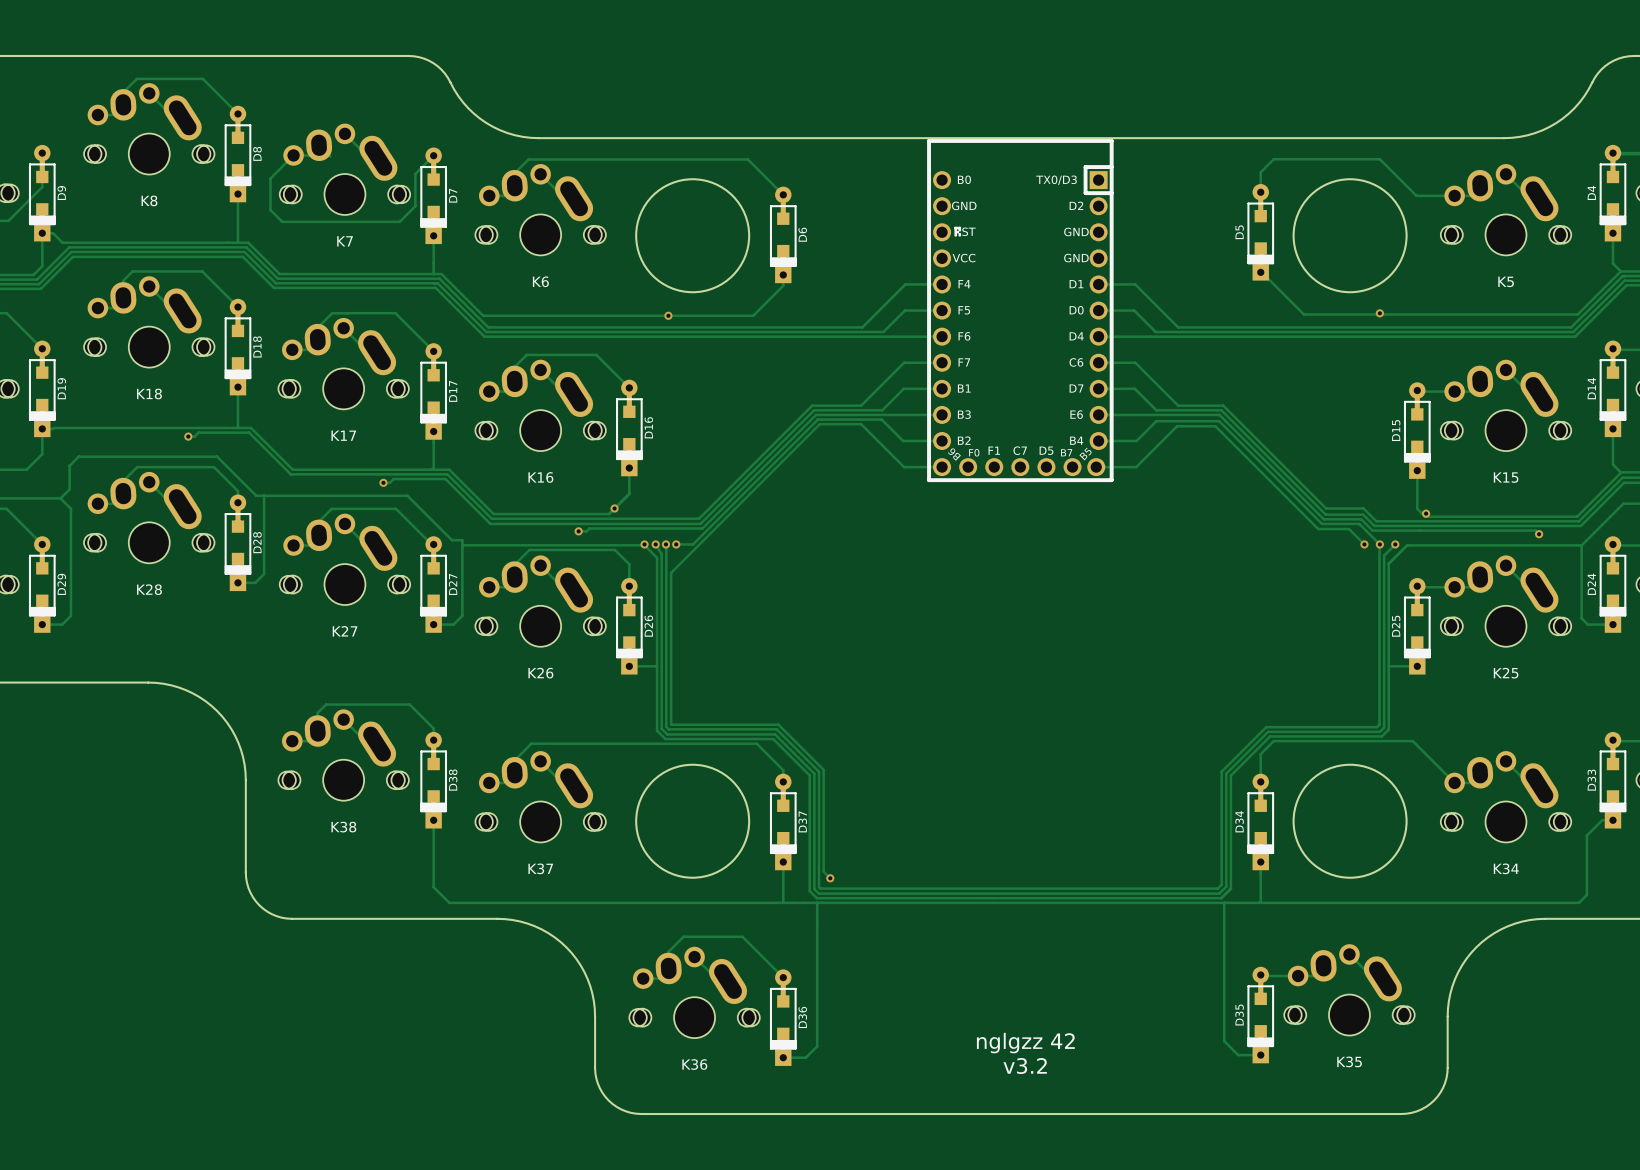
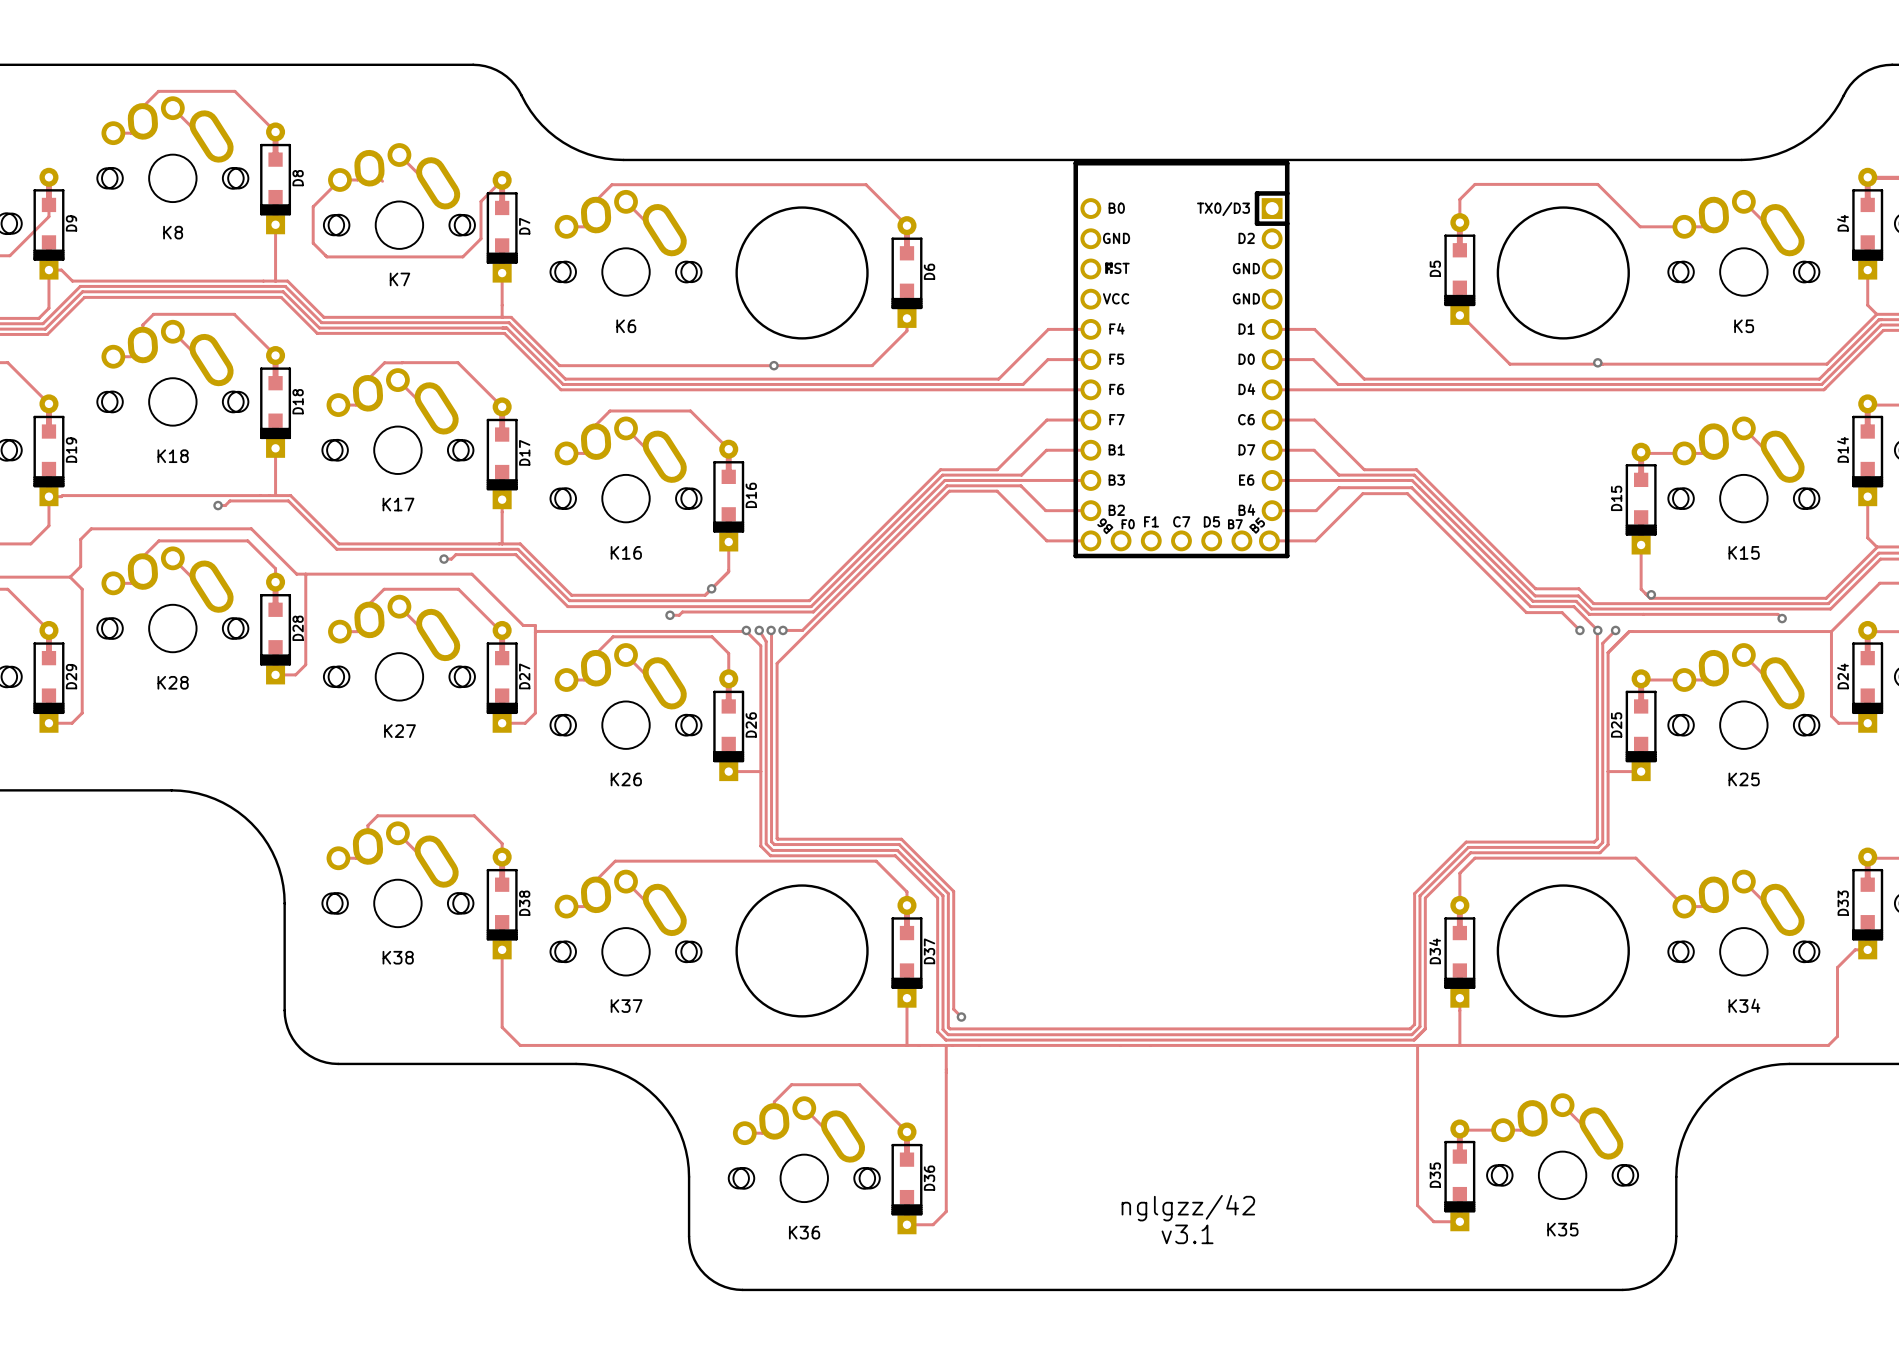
text: nglgzz 42 (1025, 1043) -> nglgzz/42 (1188, 1208)
text: v3.2 (1025, 1066) -> v3.1 (1187, 1234)

